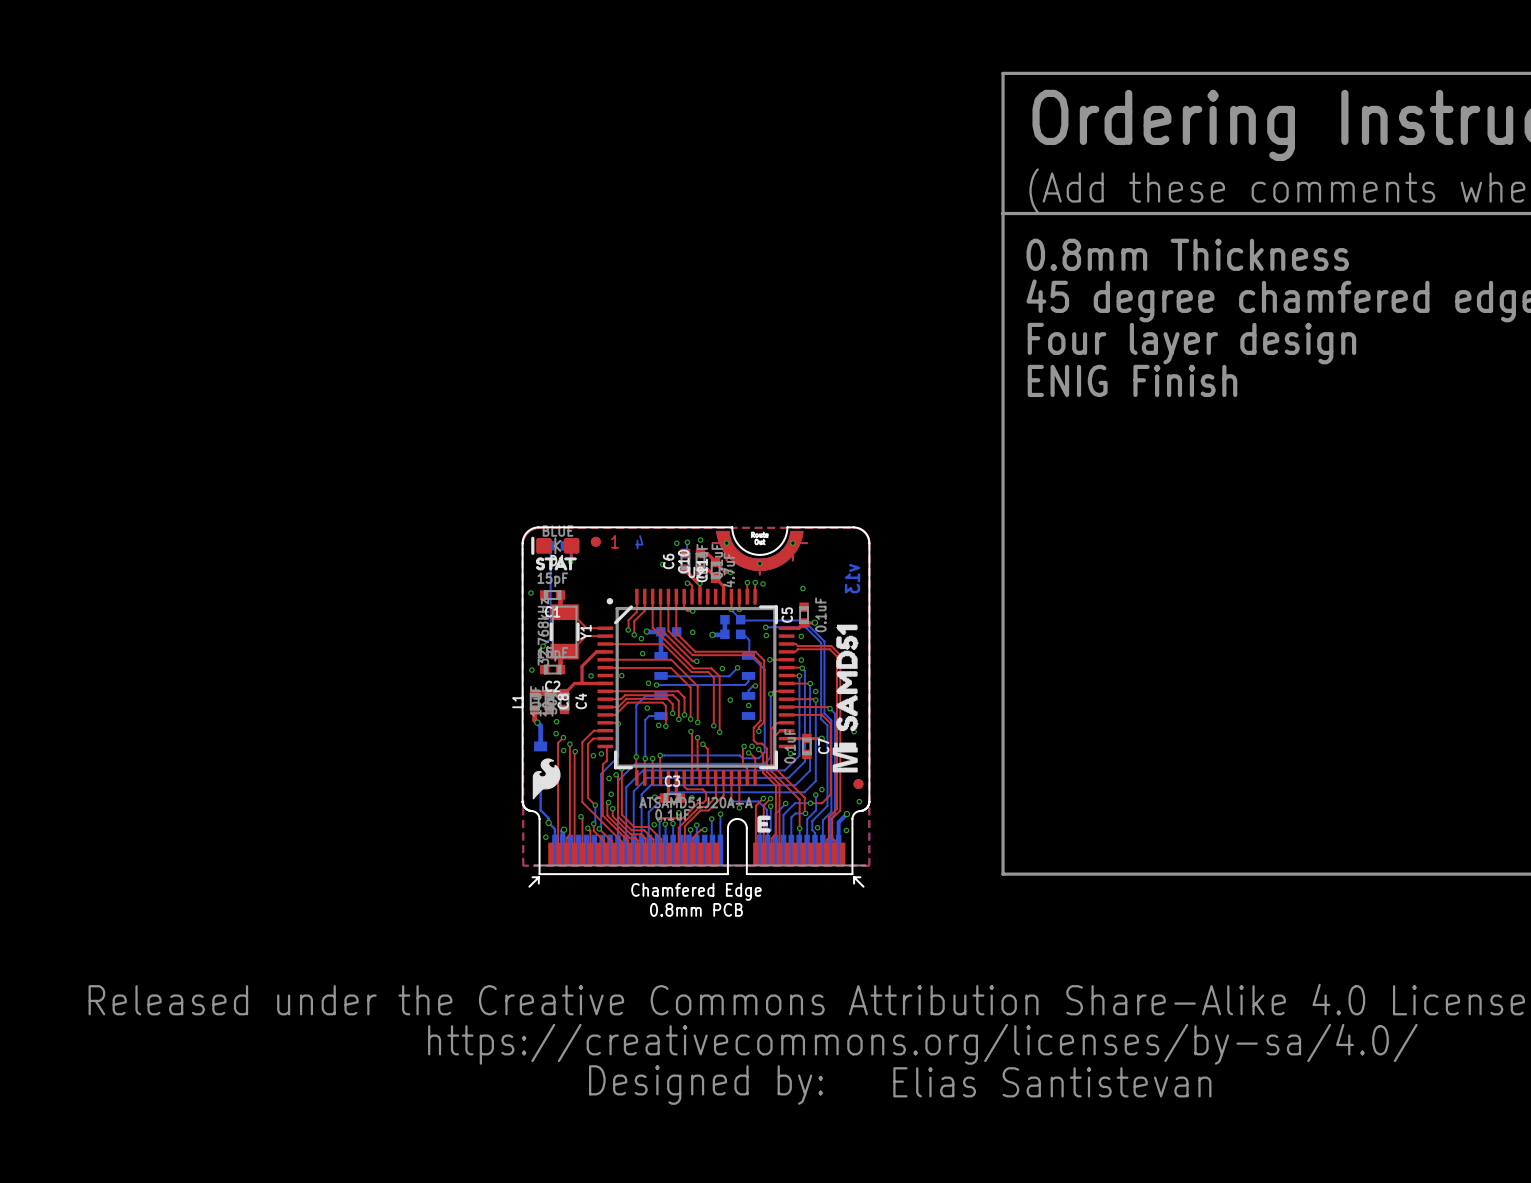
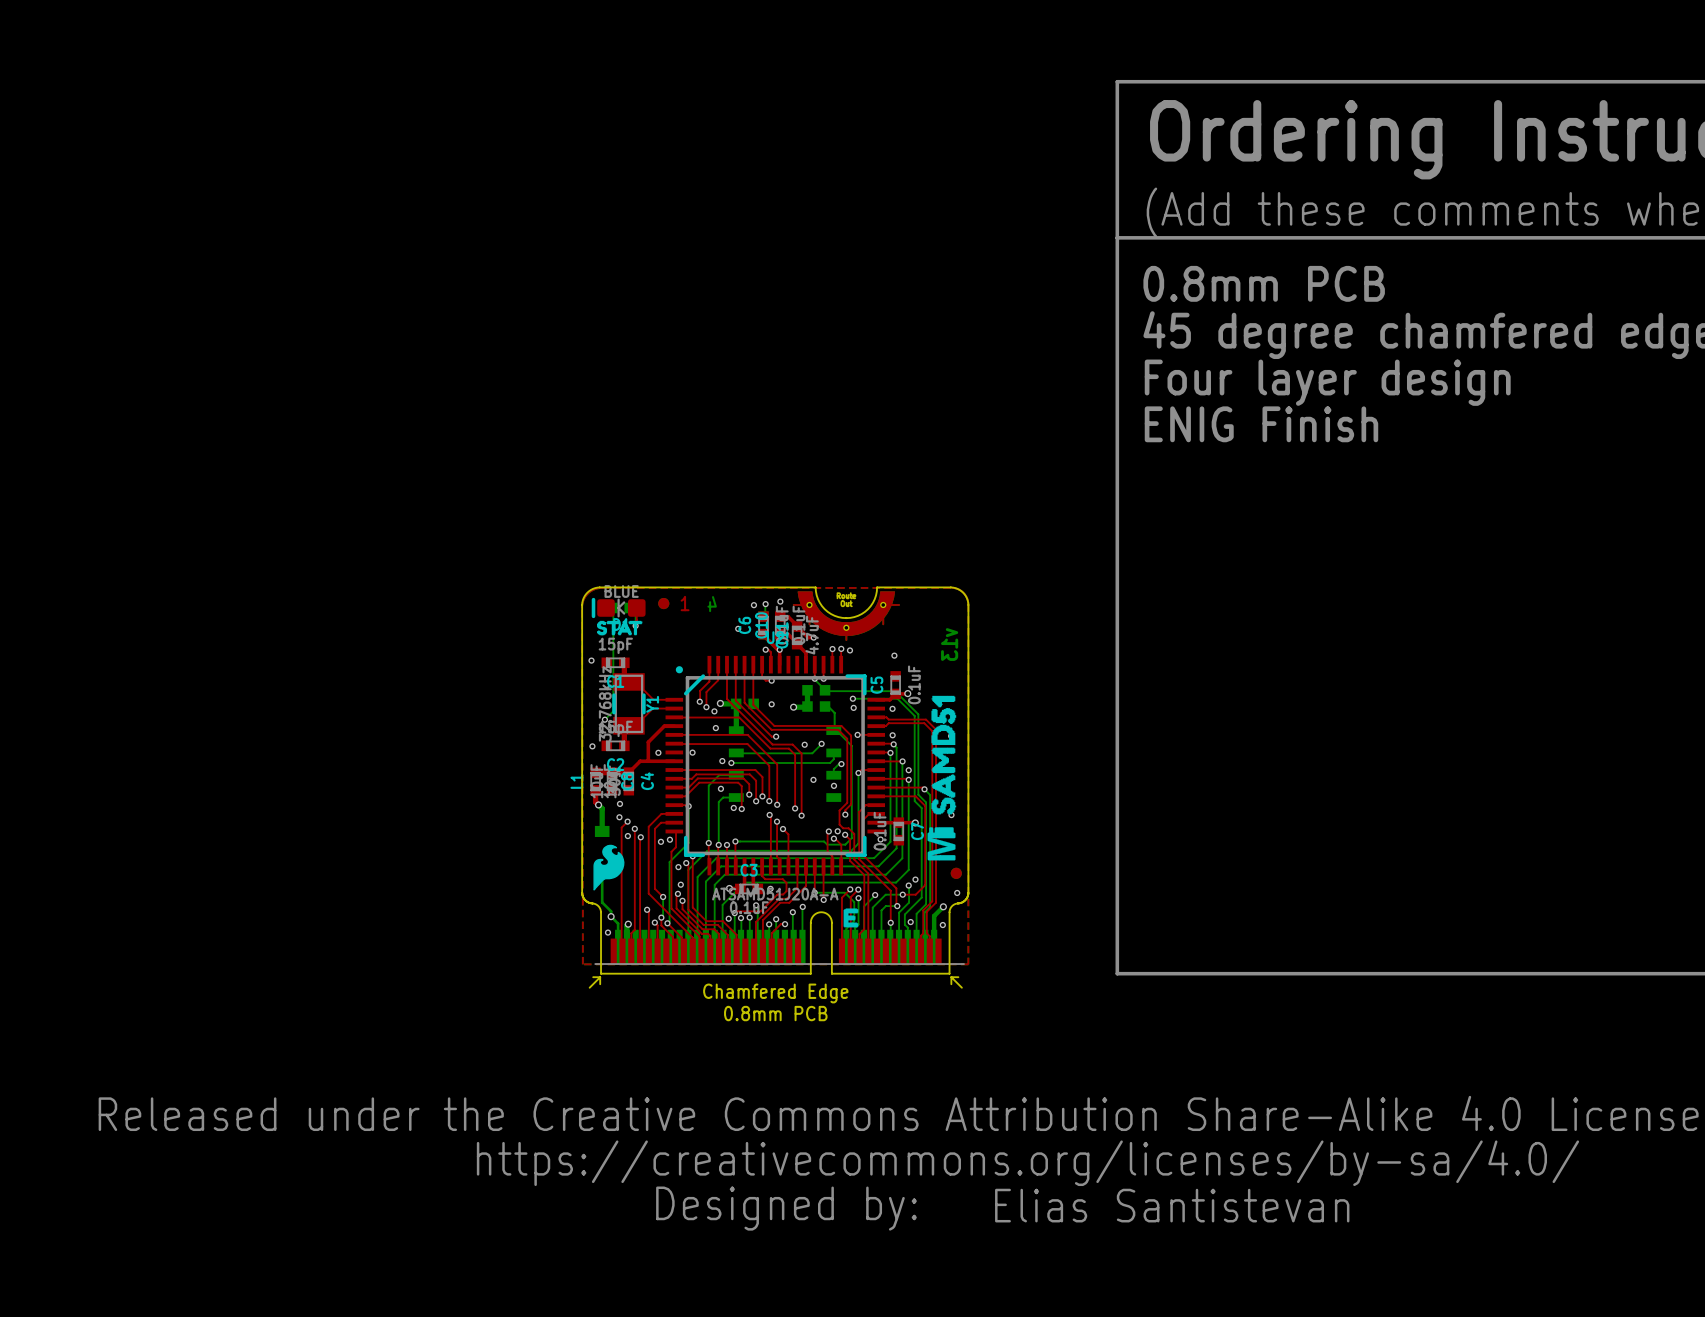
text: 0.8mm Thickness (1187, 254) -> 0.8mm PCB (1264, 283)

